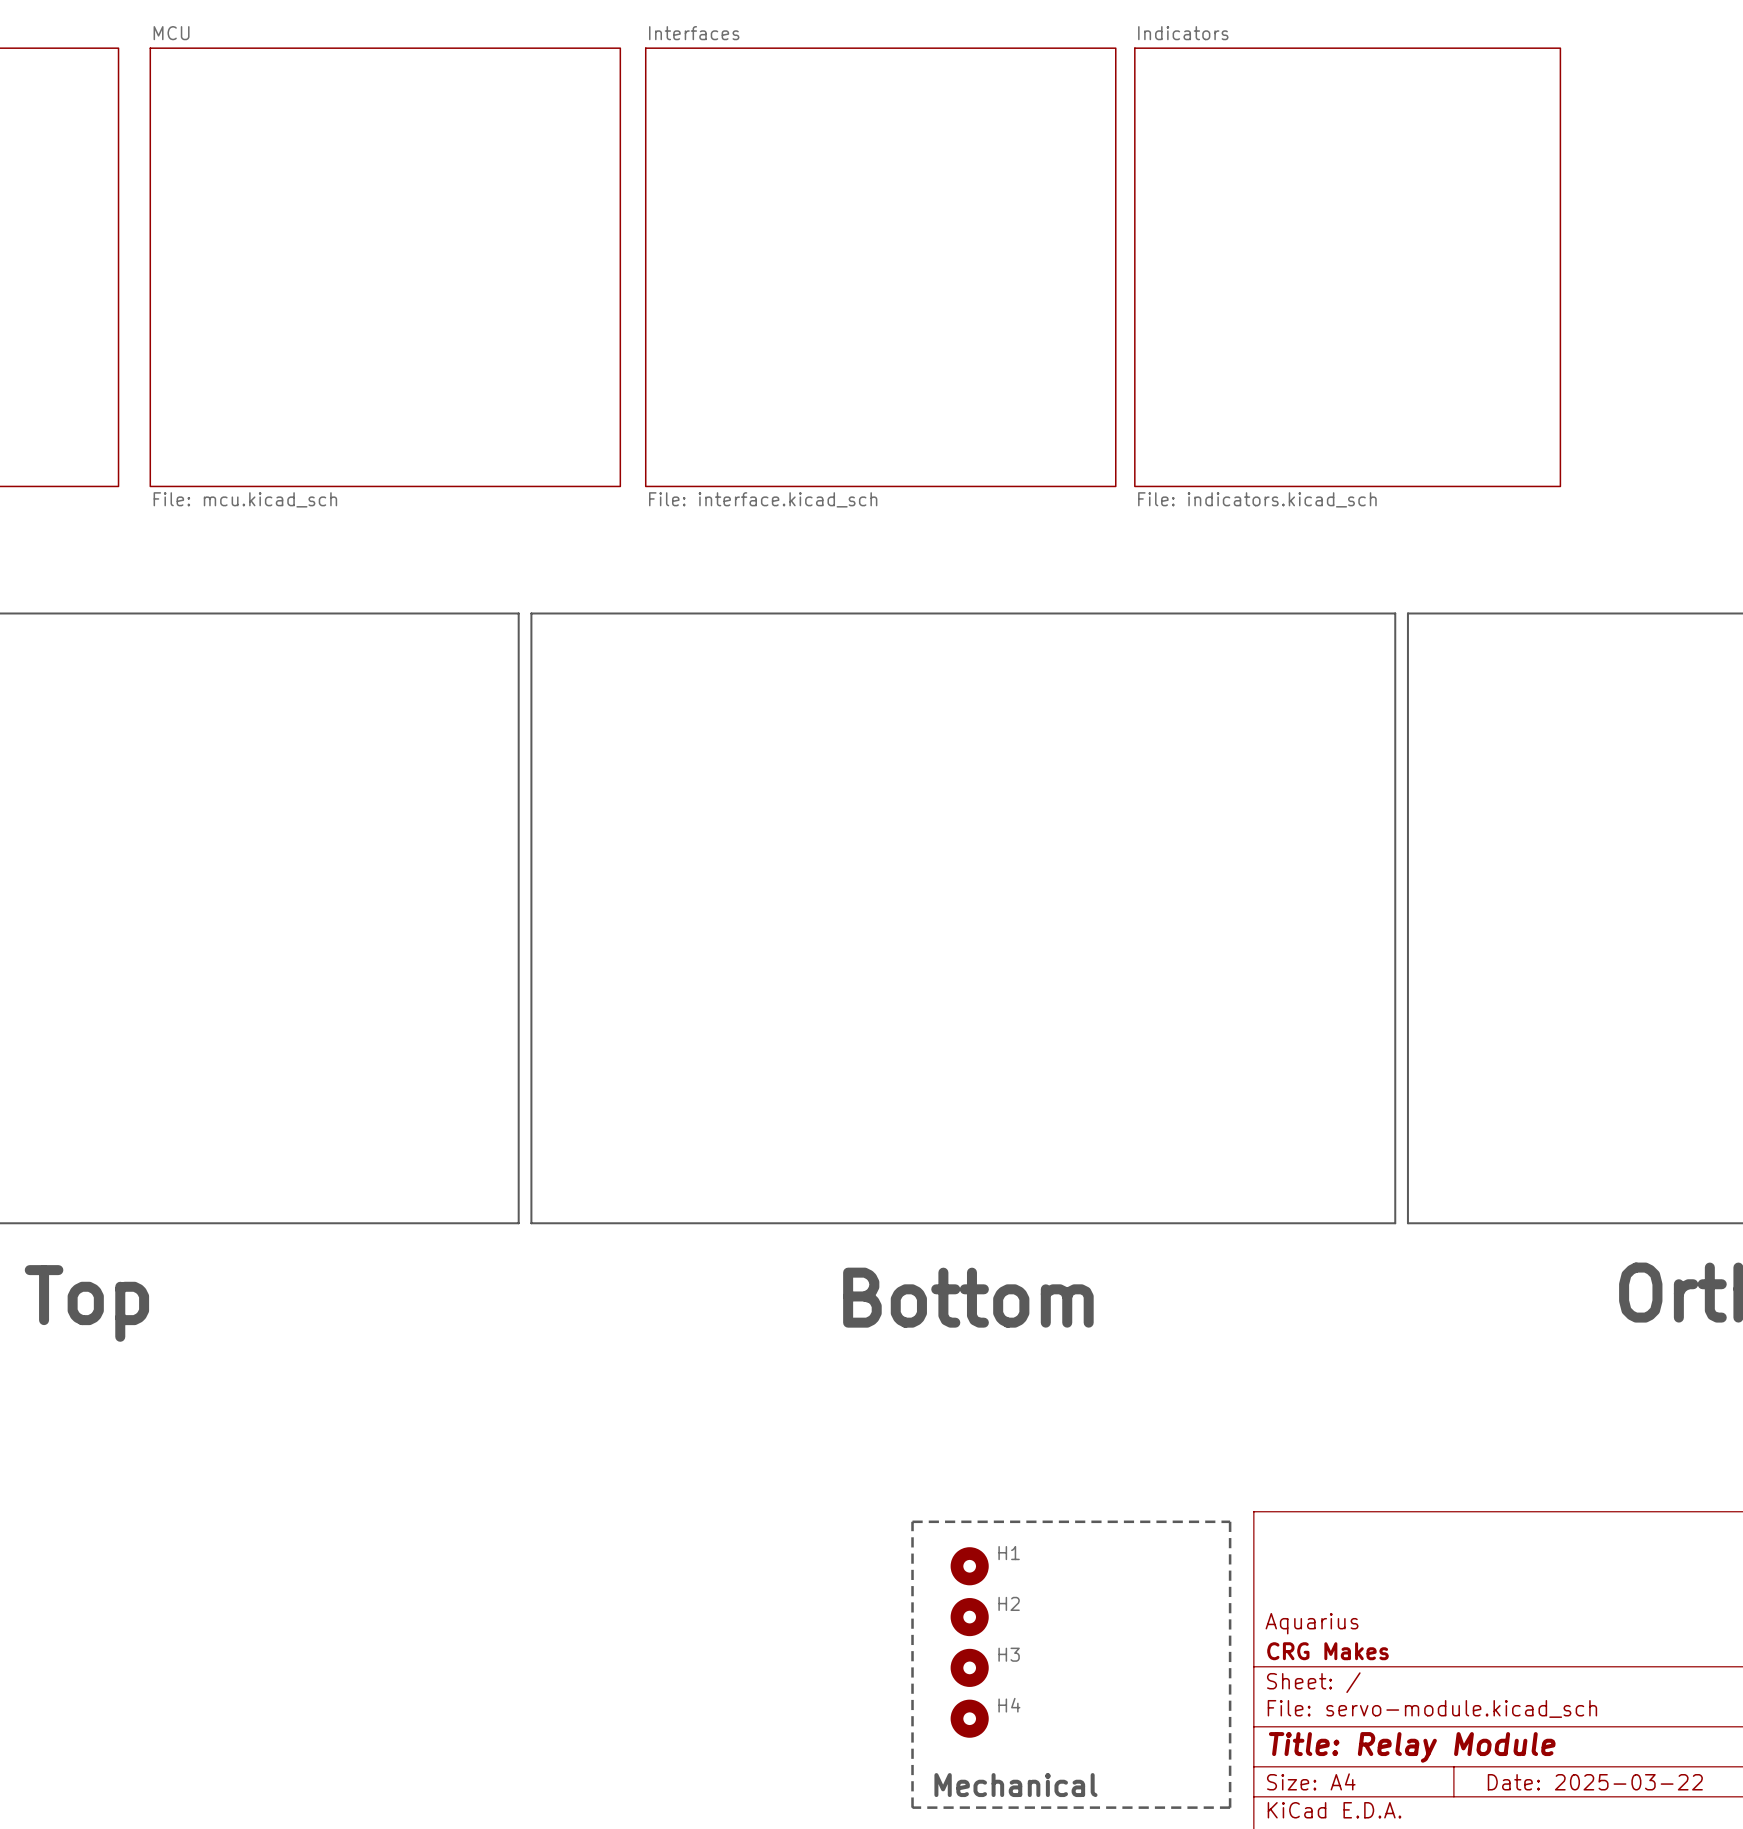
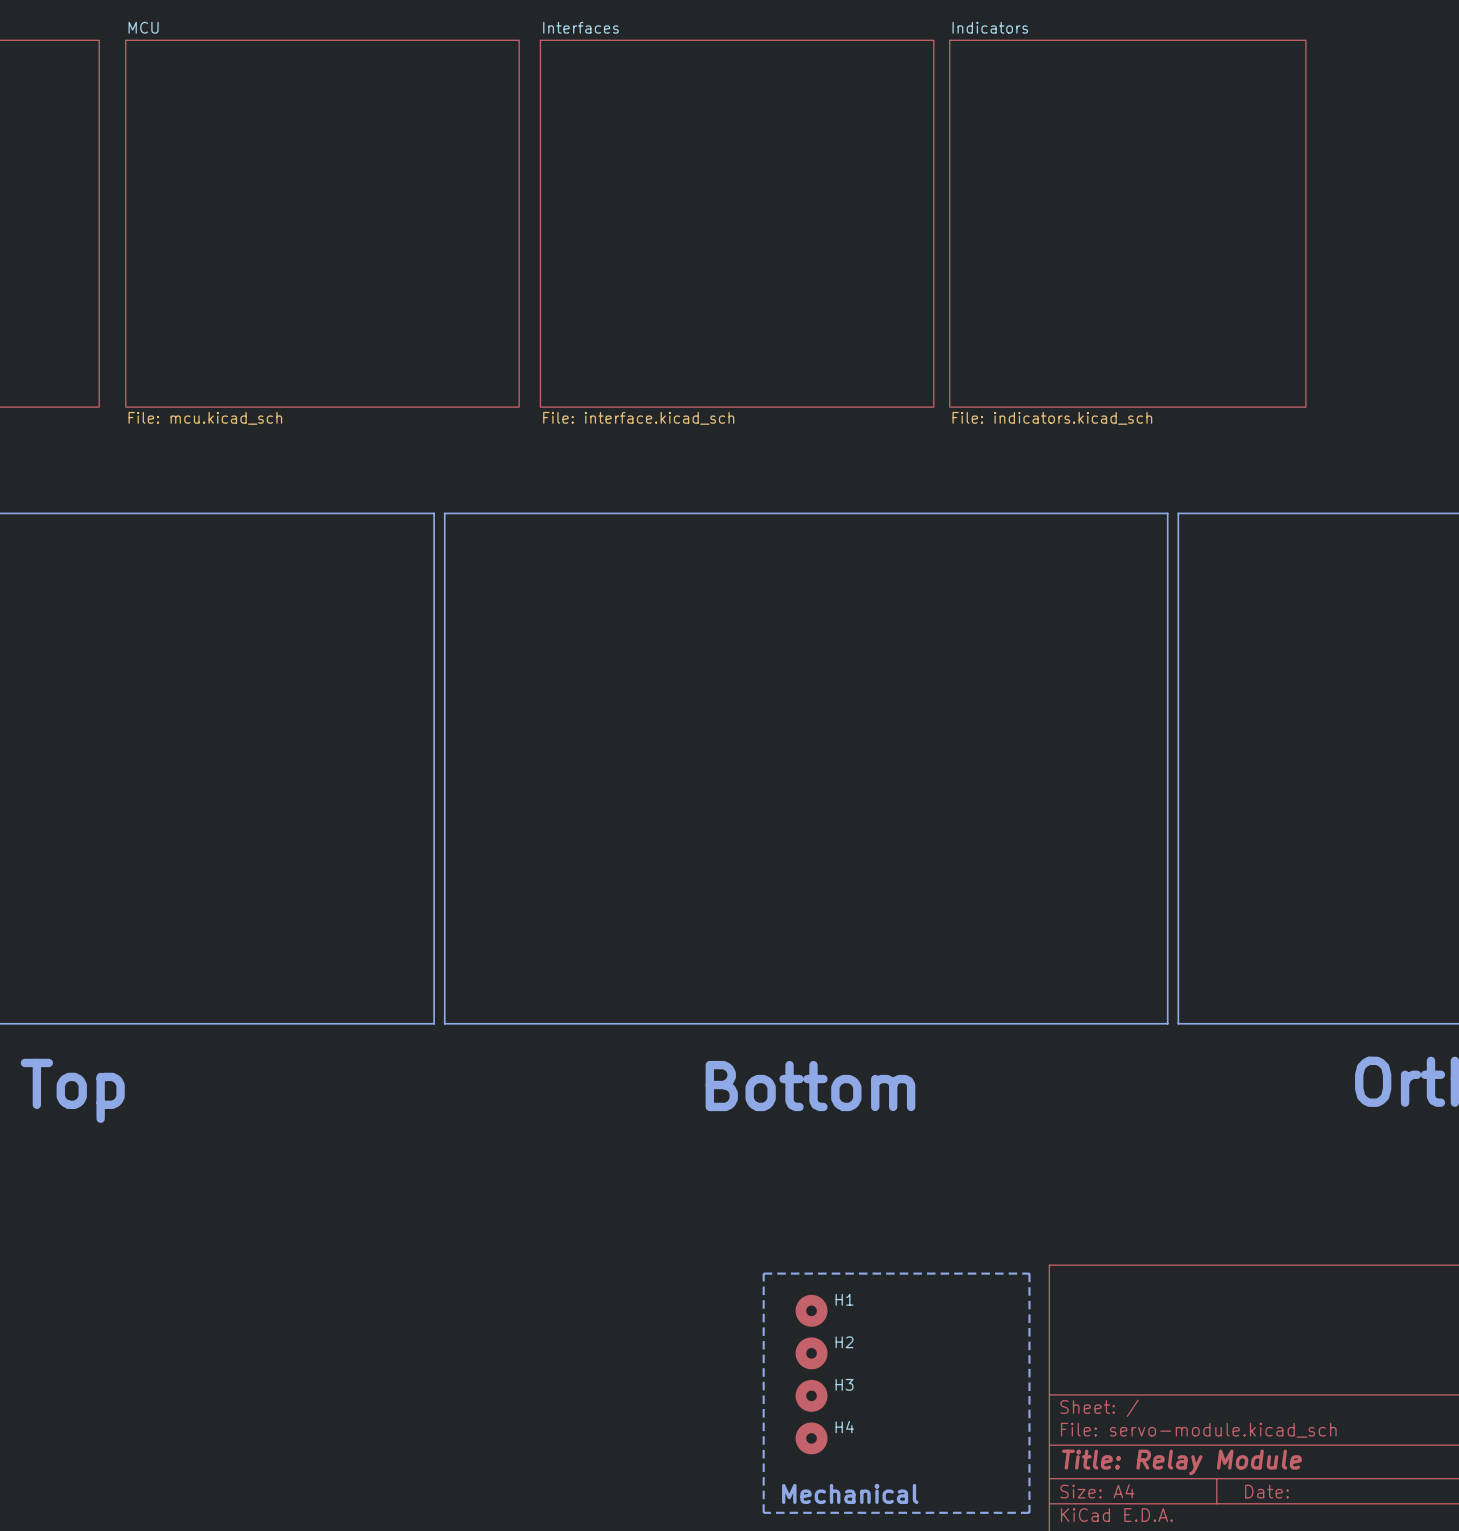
title block: Aquarius (1312, 1623) -> none
title block: CRG Makes (1327, 1651) -> none
title block: Date: 2025-03-22 (1595, 1782) -> Date: (1266, 1491)

